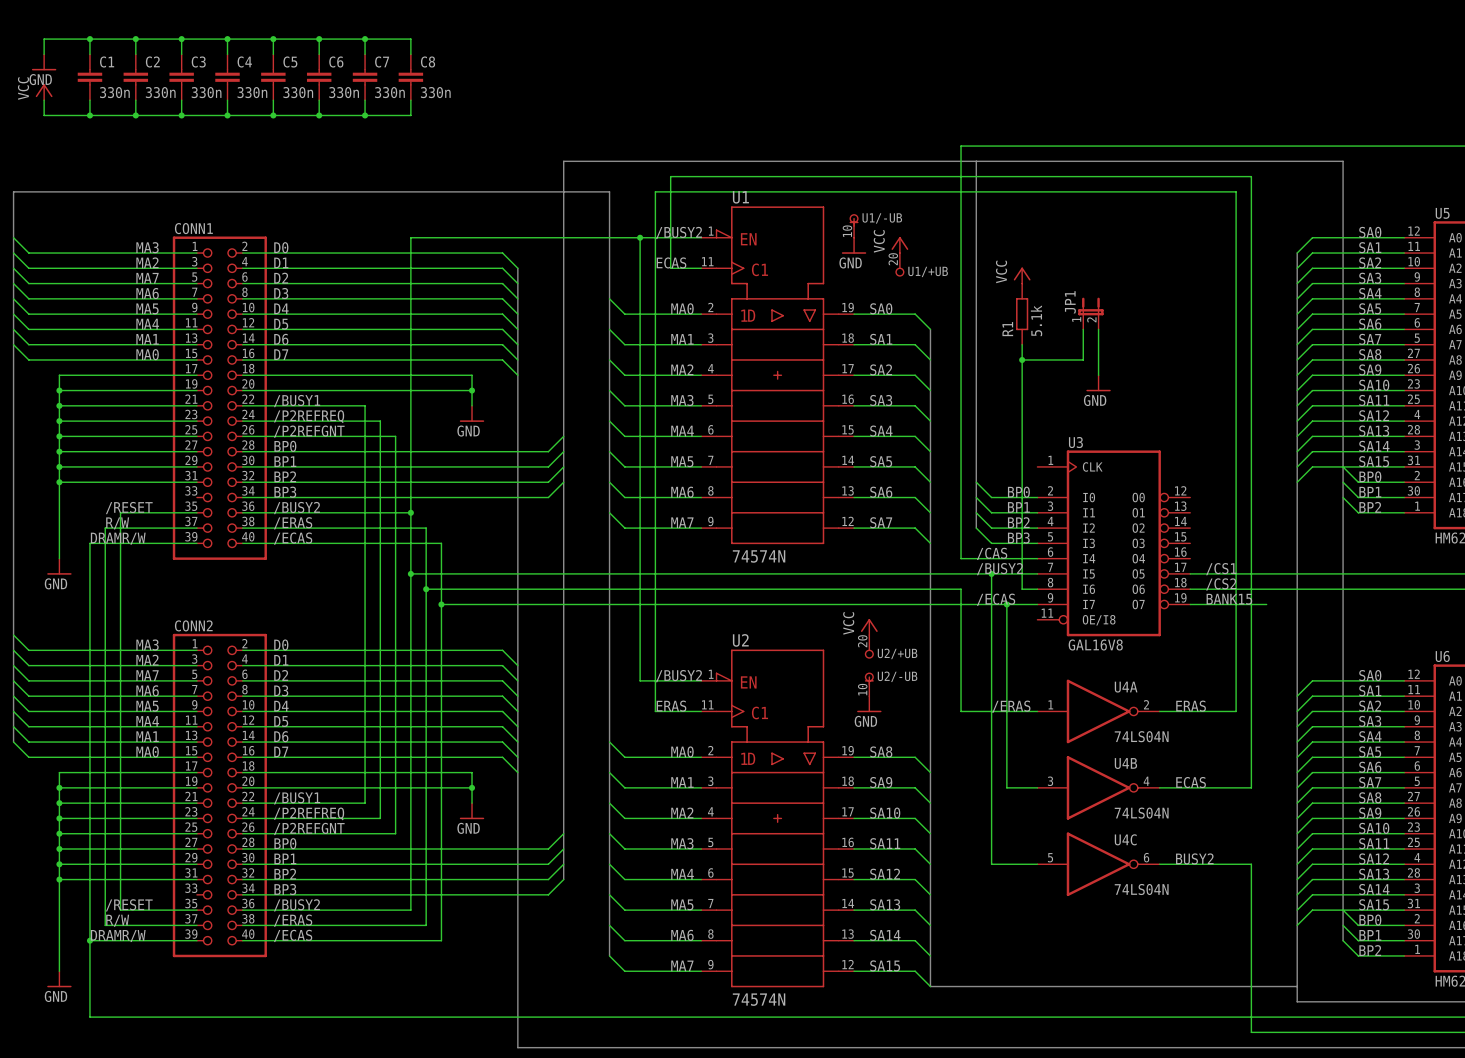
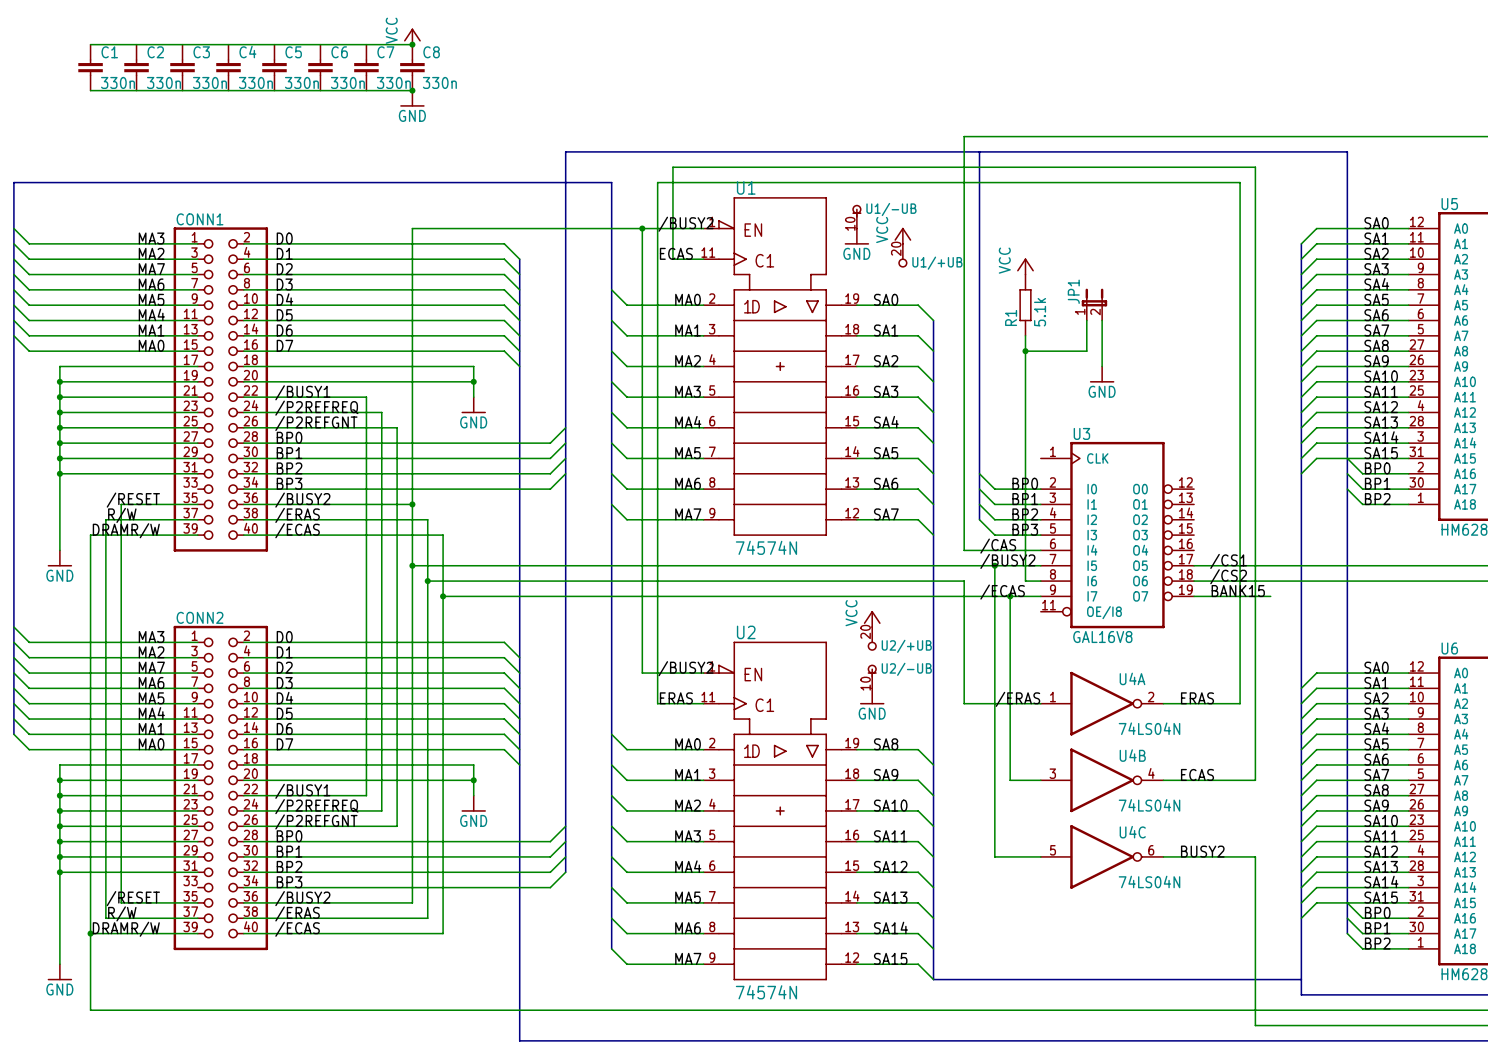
wire: (89, 39) (89, 54) -> none
junction: (89, 39) -> none
wire: (135, 39) (135, 54) -> none
junction: (135, 39) -> none
wire: (181, 39) (181, 54) -> none
junction: (181, 39) -> none
wire: (227, 39) (227, 54) -> none
junction: (227, 39) -> none
wire: (273, 39) (273, 54) -> none
junction: (273, 39) -> none
wire: (319, 39) (319, 54) -> none
junction: (319, 39) -> none
wire: (365, 39) (365, 54) -> none
junction: (365, 39) -> none
power symbol: none -> VCC (412, 36)
wire: (44, 54) (44, 39) (410, 39) (410, 54) -> (90, 44) (412, 44)
junction: none -> (412, 44)
power symbol: GND (44, 62) -> none
power symbol: VCC (44, 92) -> none
wire: (44, 100) (44, 115) (410, 115) (410, 100) -> (90, 90) (412, 90)
wire: (89, 100) (89, 115) -> none
wire: (135, 100) (135, 115) -> none
wire: (181, 100) (181, 115) -> none
wire: (227, 100) (227, 115) -> none
wire: (273, 100) (273, 115) -> none
wire: (319, 100) (319, 115) -> none
wire: (365, 100) (365, 115) -> none
junction: none -> (412, 90)
power symbol: none -> GND (412, 98)
junction: (89, 115) -> none
junction: (135, 115) -> none
junction: (181, 115) -> none
junction: (227, 115) -> none
junction: (273, 115) -> none
junction: (319, 115) -> none
junction: (365, 115) -> none

